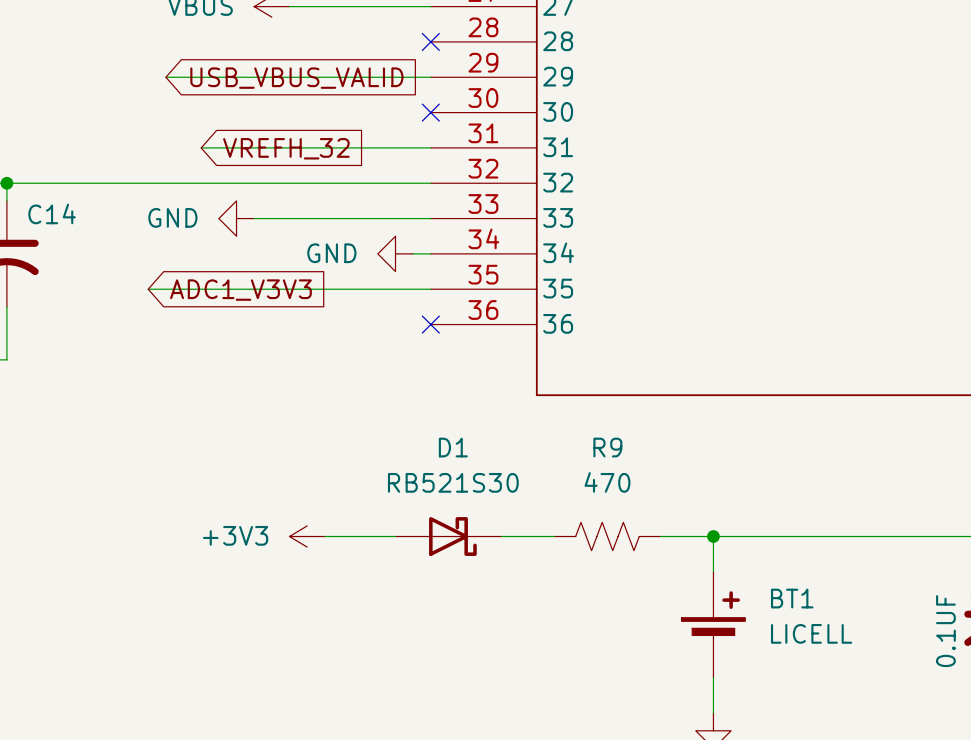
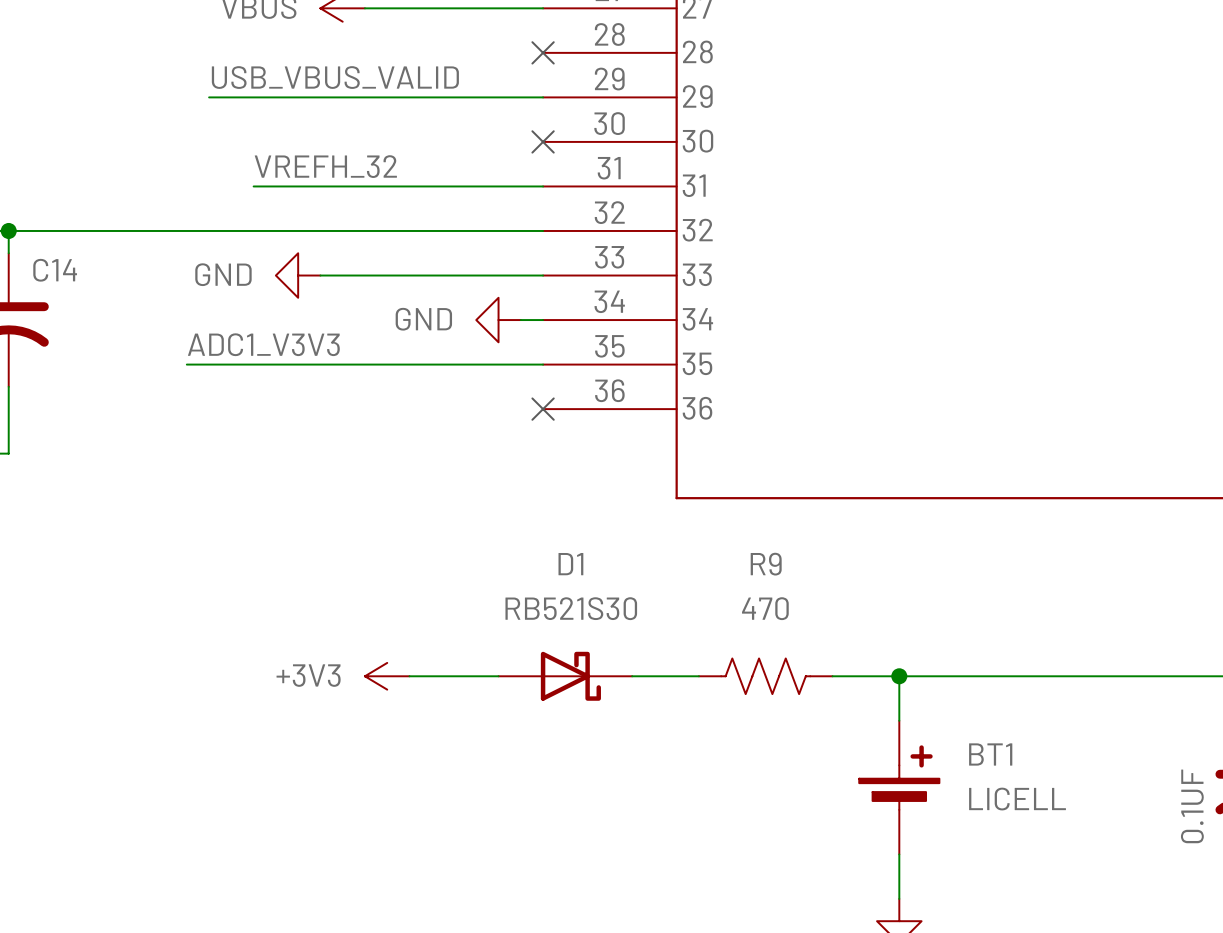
label: none -> USB_VBUS_VALID (335, 77)
global label: USB_VBUS_VALID (296, 78) -> none
label: none -> VREFH_32 (325, 166)
global label: VREFH_32 (286, 148) -> none
label: none -> ADC1_V3V3 (263, 344)
global label: ADC1_V3V3 (240, 290) -> none

